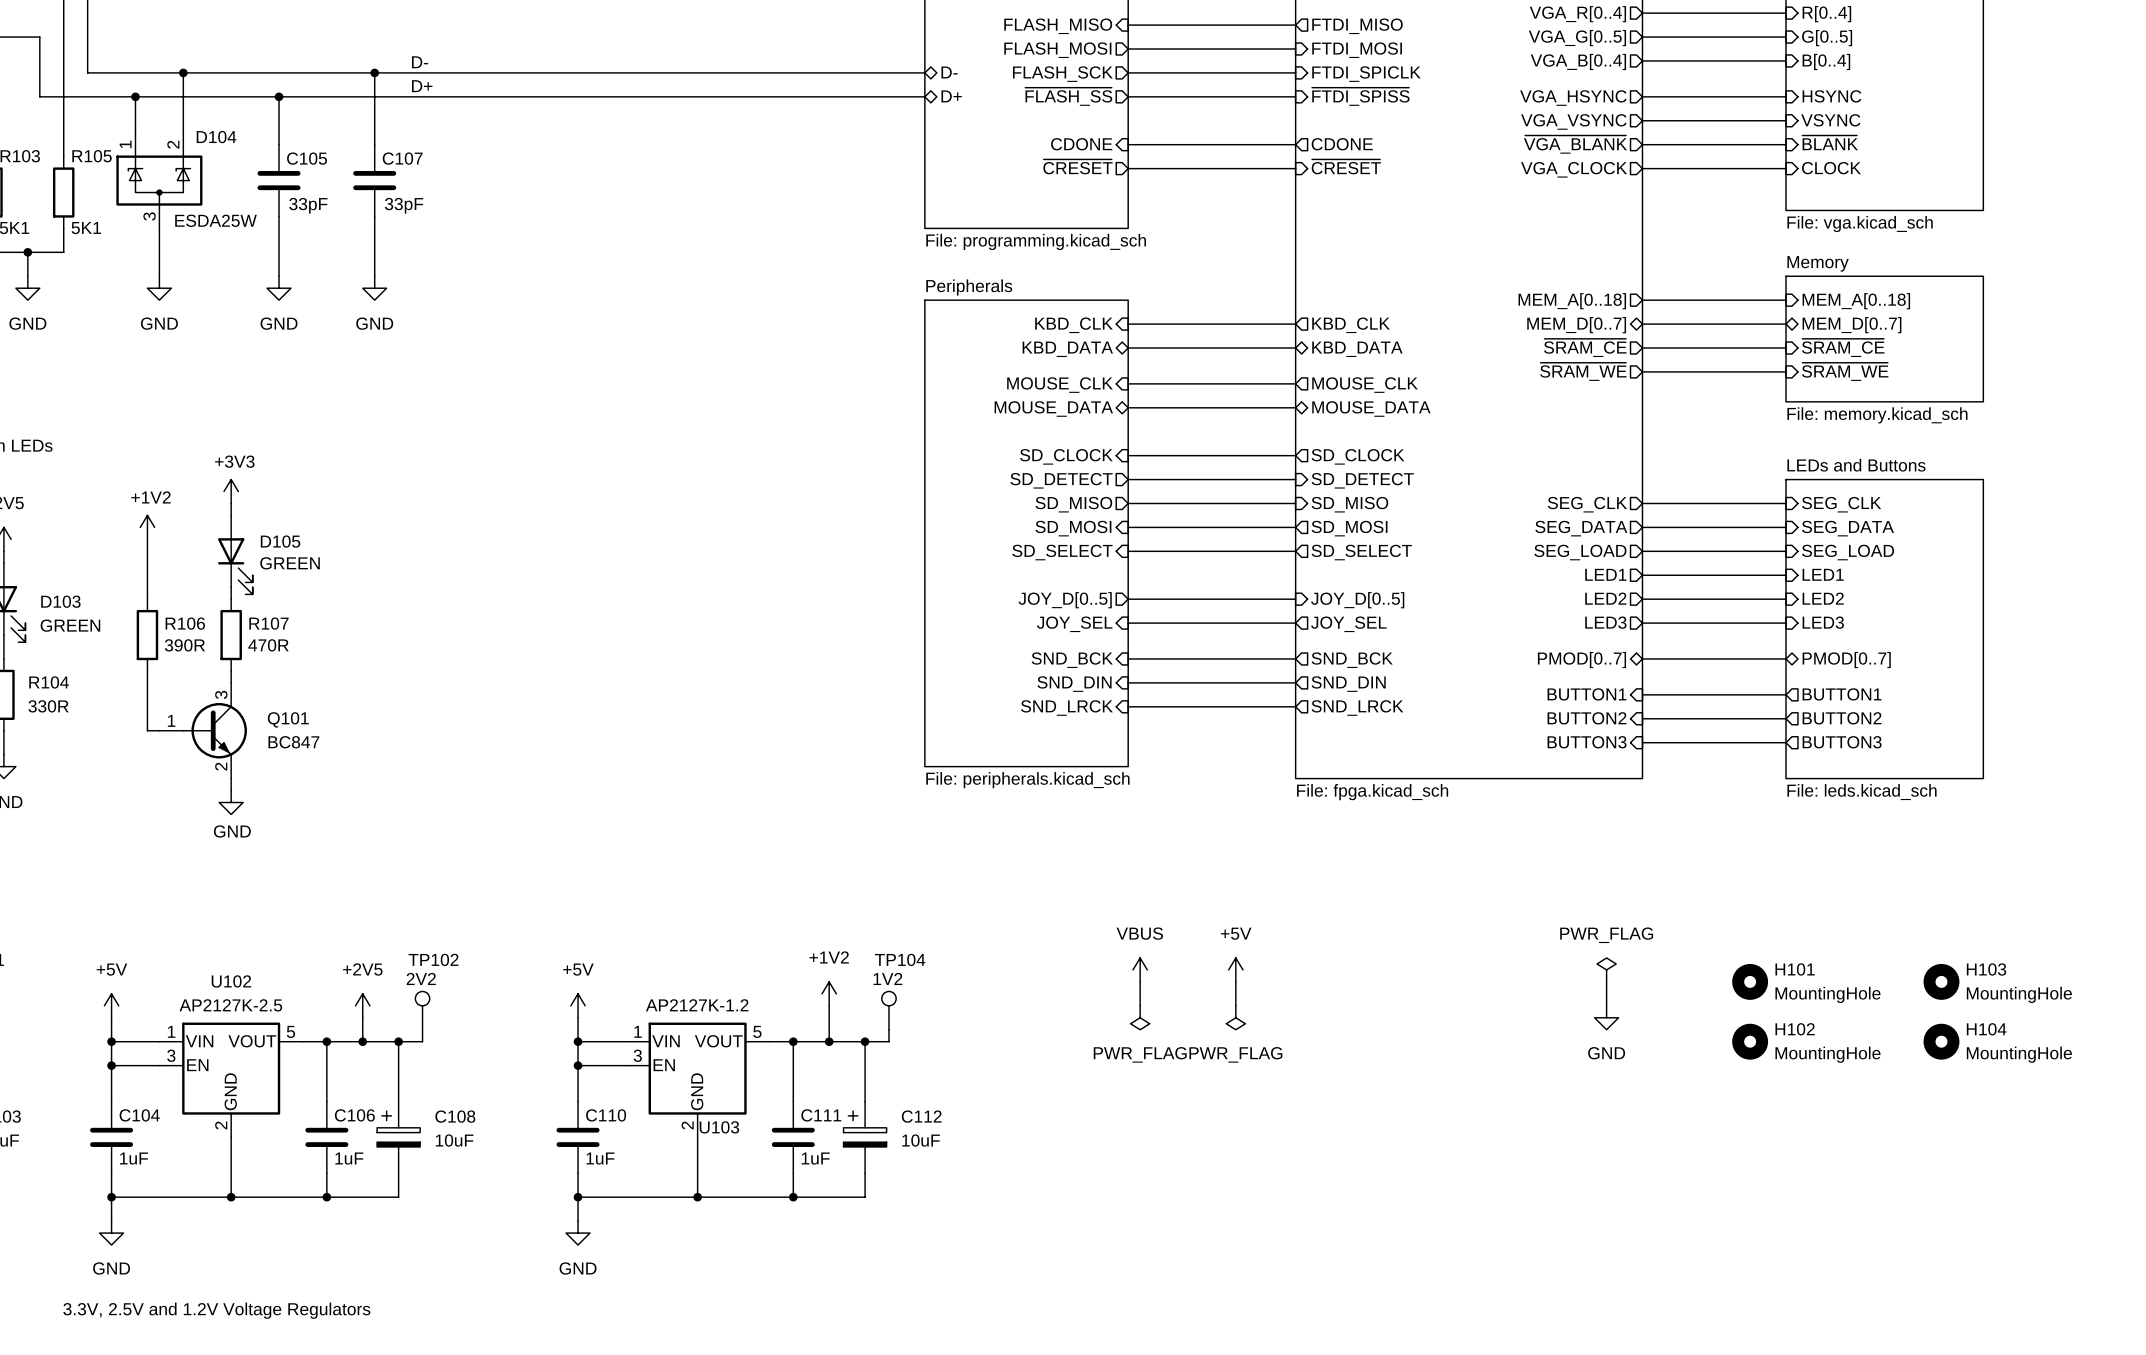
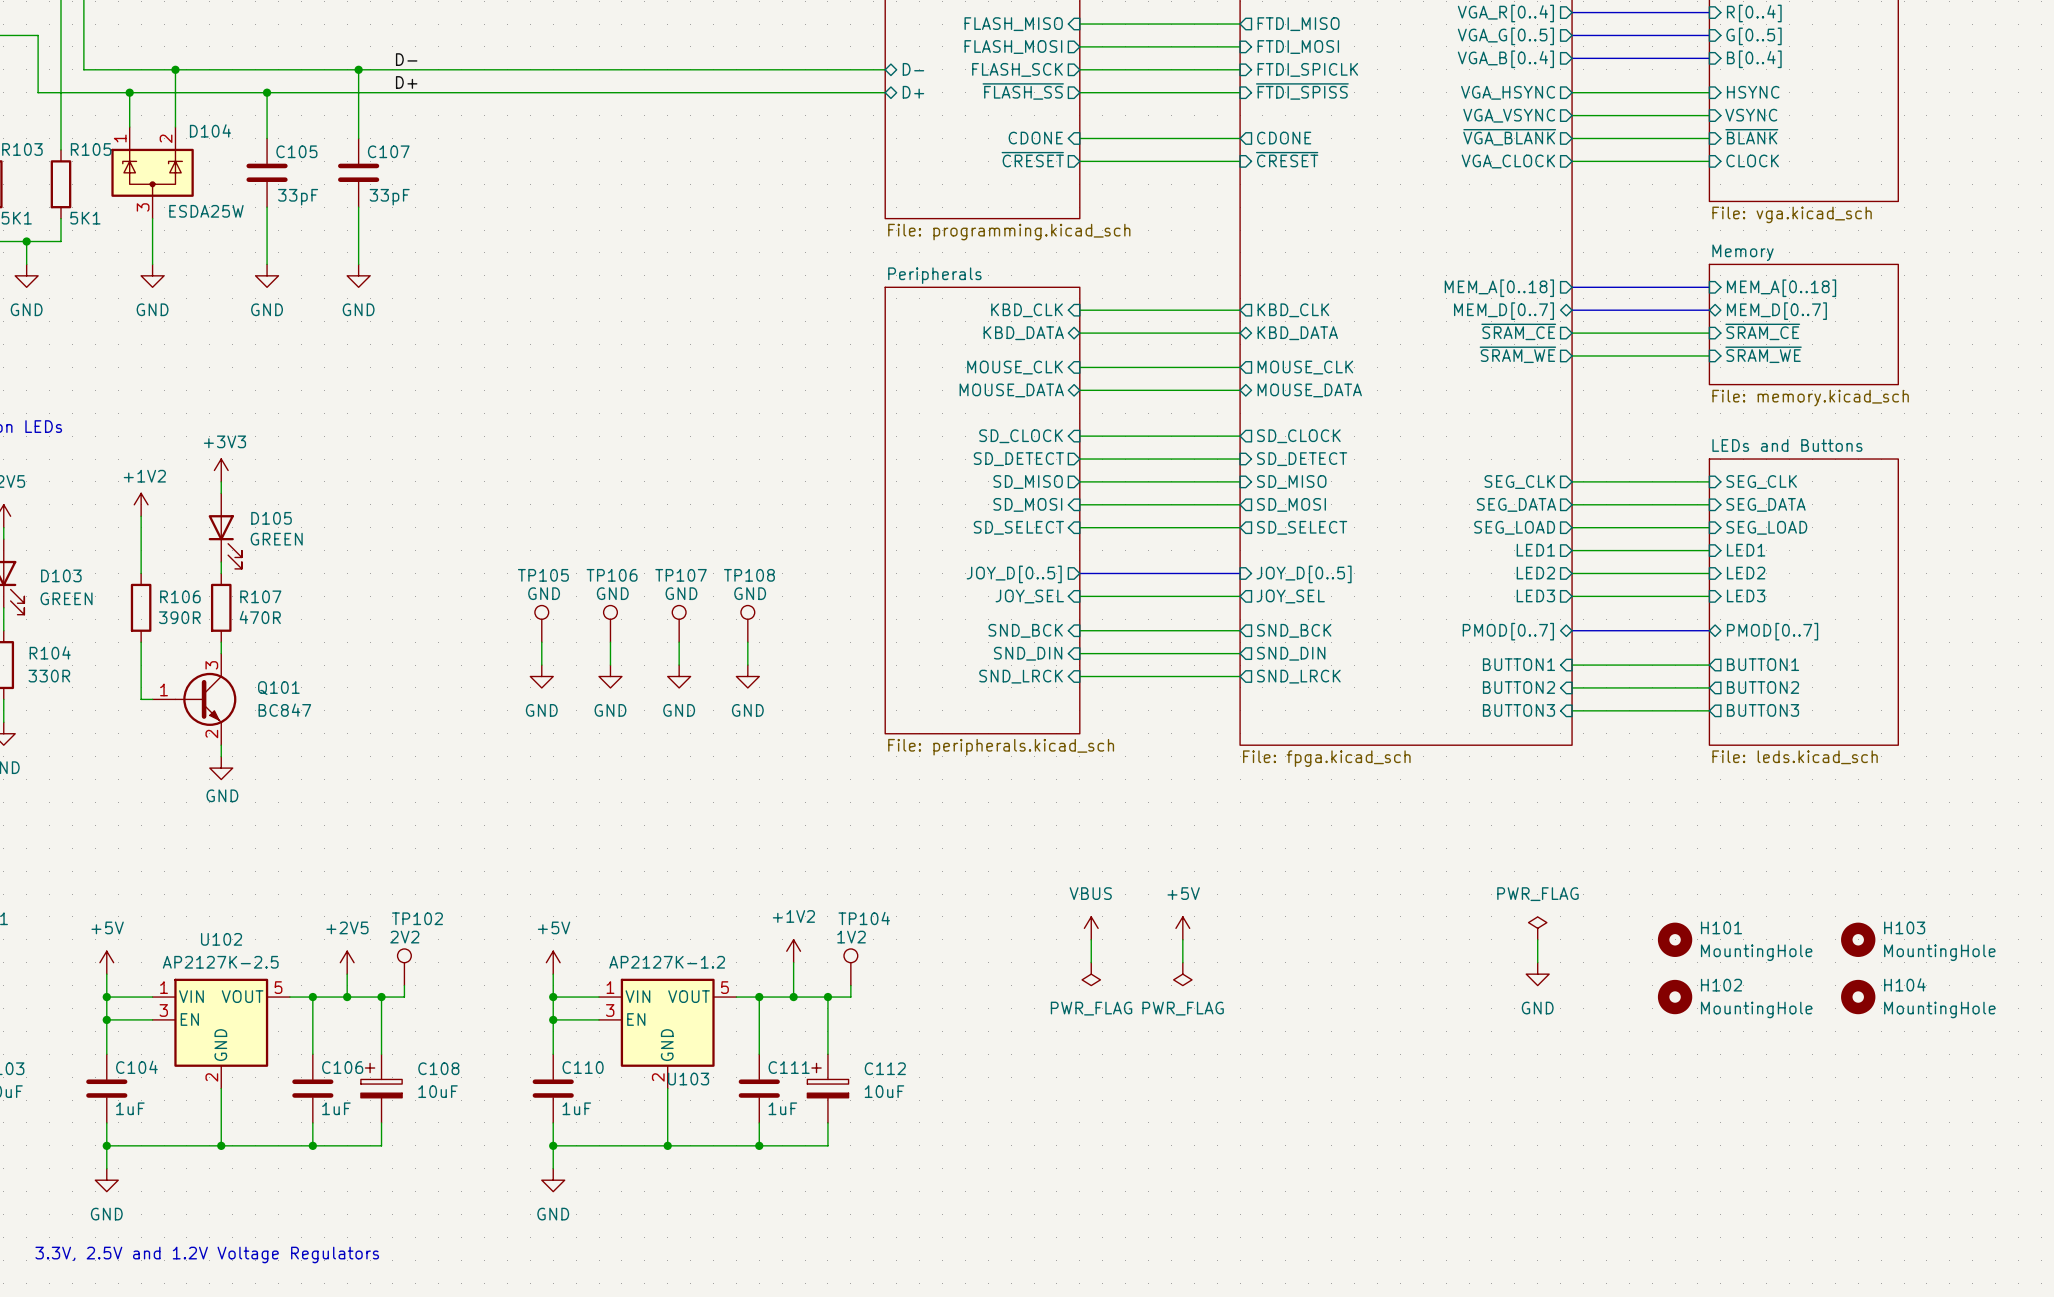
TP105: none -> GND (541, 623)
TP106: none -> GND (610, 623)
TP107: none -> GND (679, 623)
TP108: none -> GND (747, 623)
wire: none -> (541, 642) (541, 665)
wire: none -> (610, 642) (610, 665)
wire: none -> (679, 642) (679, 665)
wire: none -> (747, 642) (747, 665)
power symbol: none -> GND (541, 676)
power symbol: none -> GND (610, 676)
power symbol: none -> GND (679, 676)
power symbol: none -> GND (747, 676)

